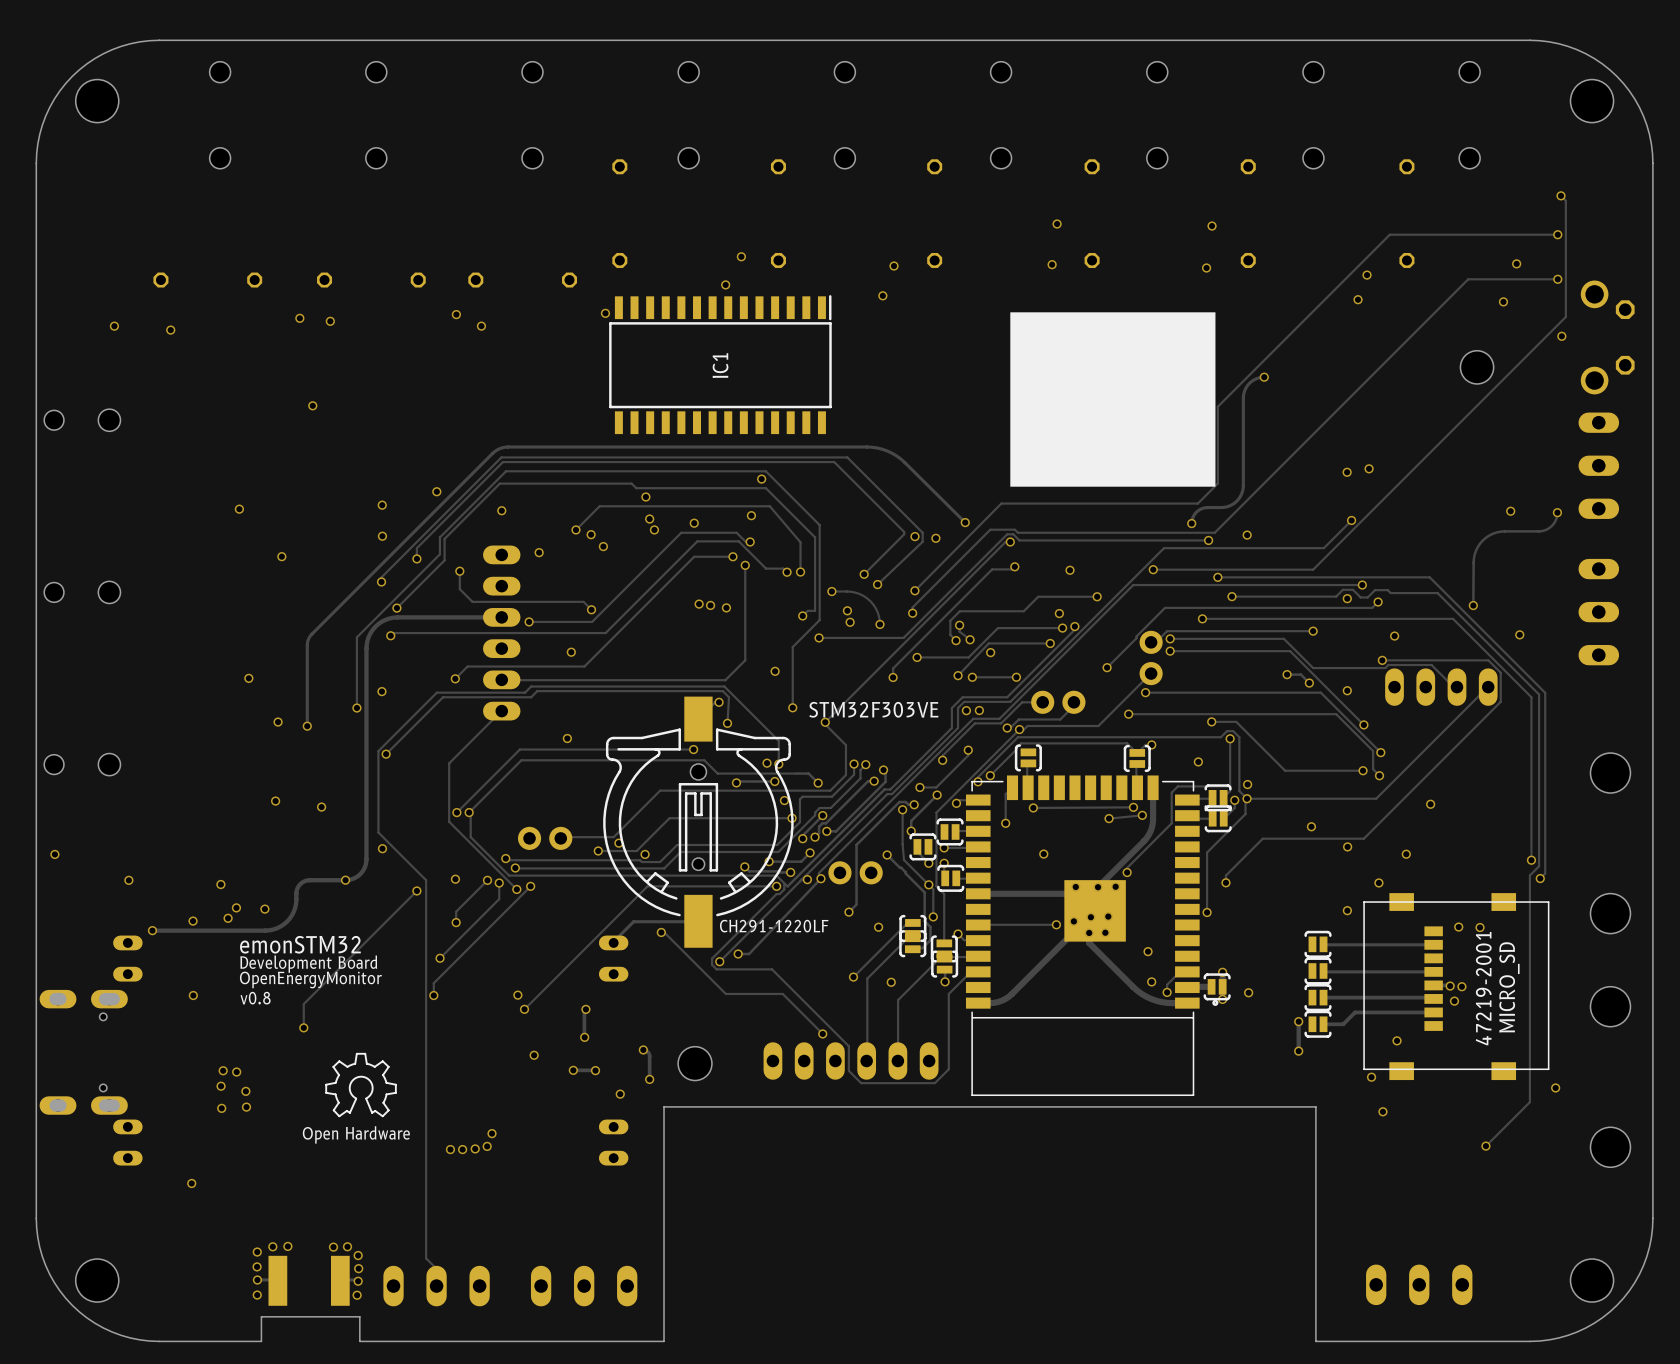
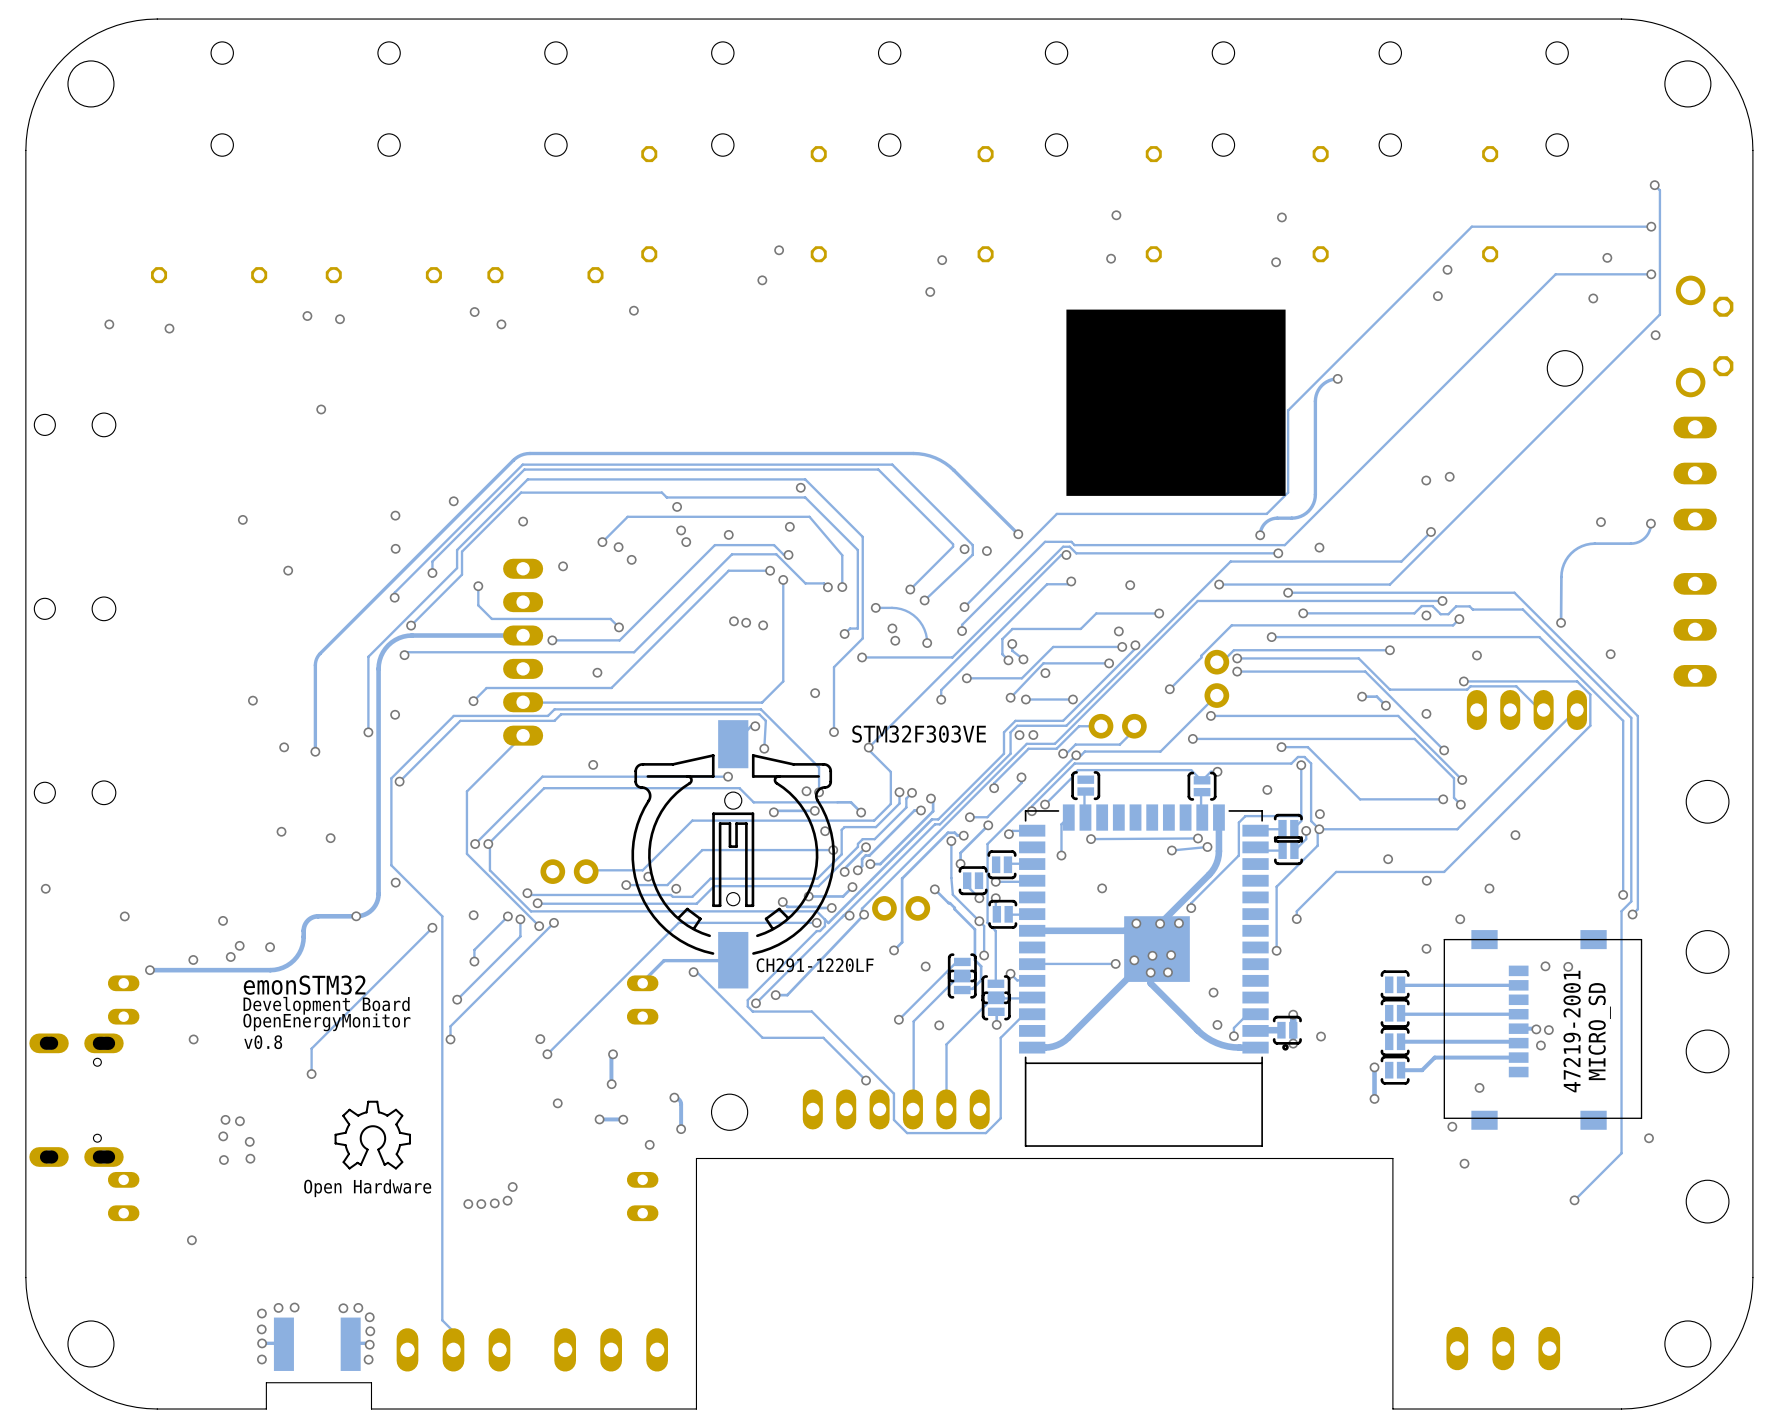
IC1: (720, 364) -> none

